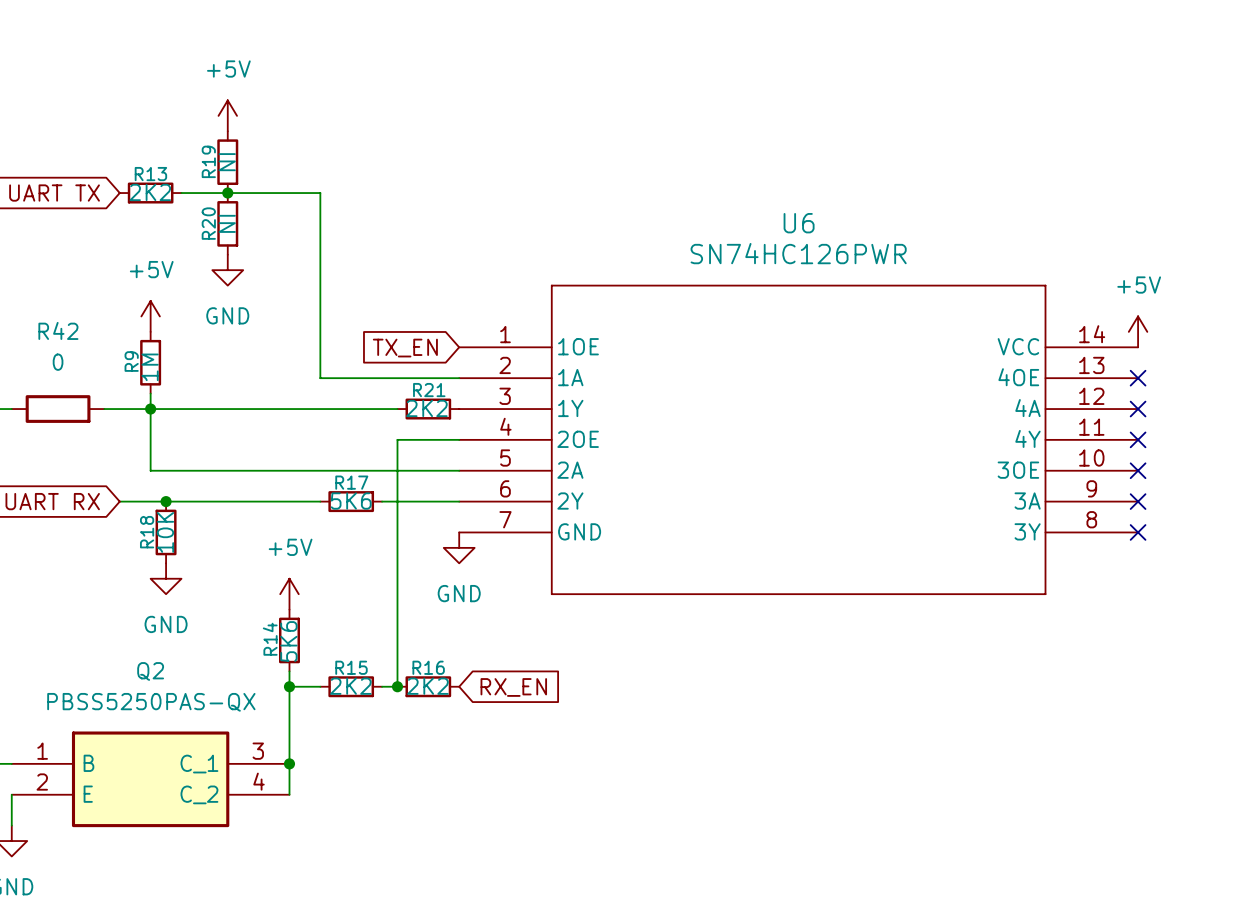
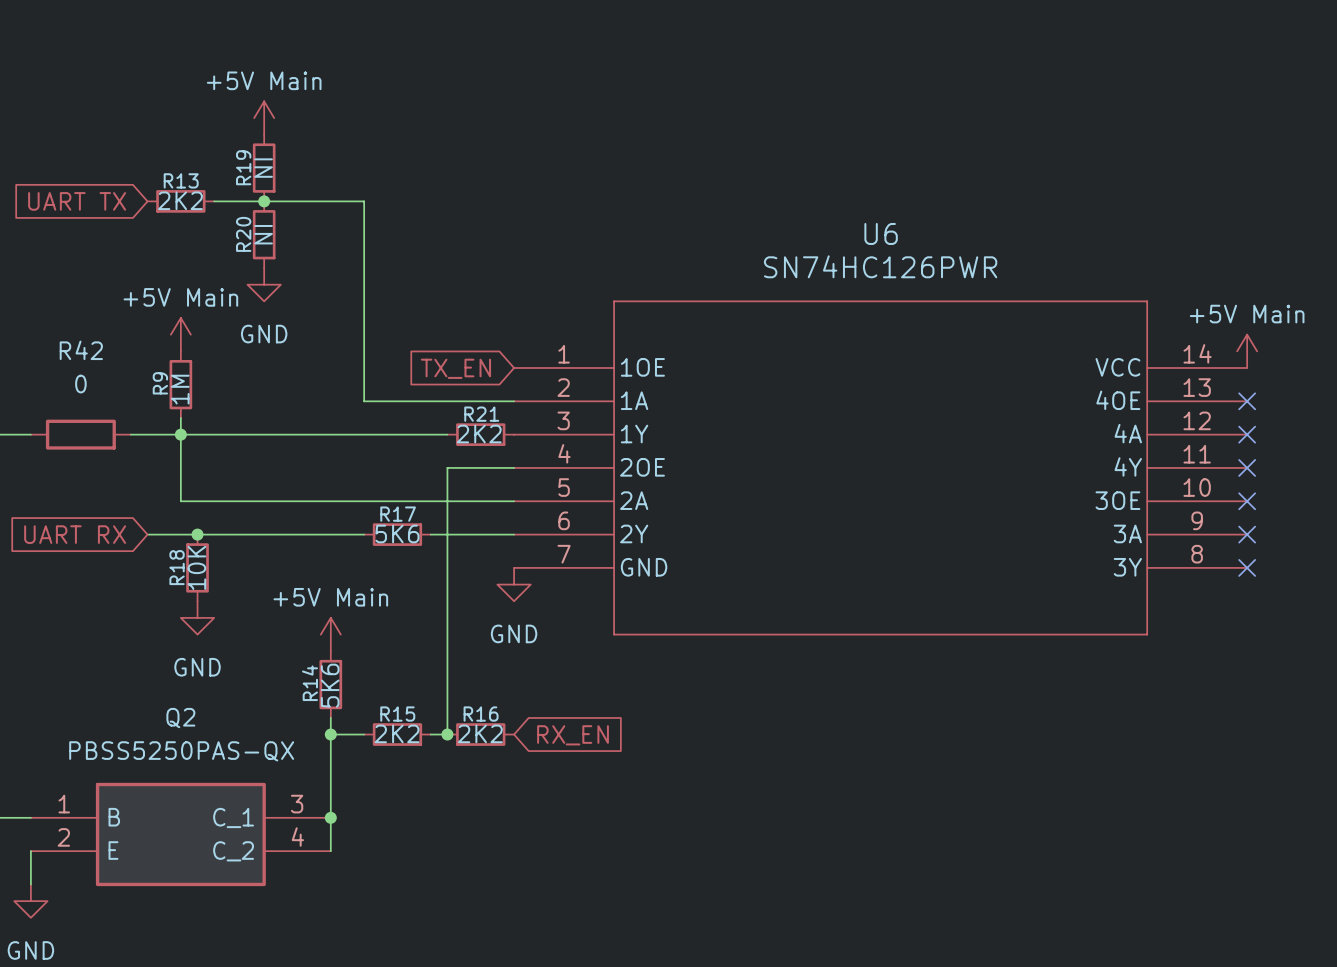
power symbol: +5V (227, 115) -> +5V Main (264, 118)
power symbol: +5V (150, 316) -> +5V Main (180, 334)
power symbol: +5V (1138, 331) -> +5V Main (1247, 351)
power symbol: +5V (289, 594) -> +5V Main (330, 634)

